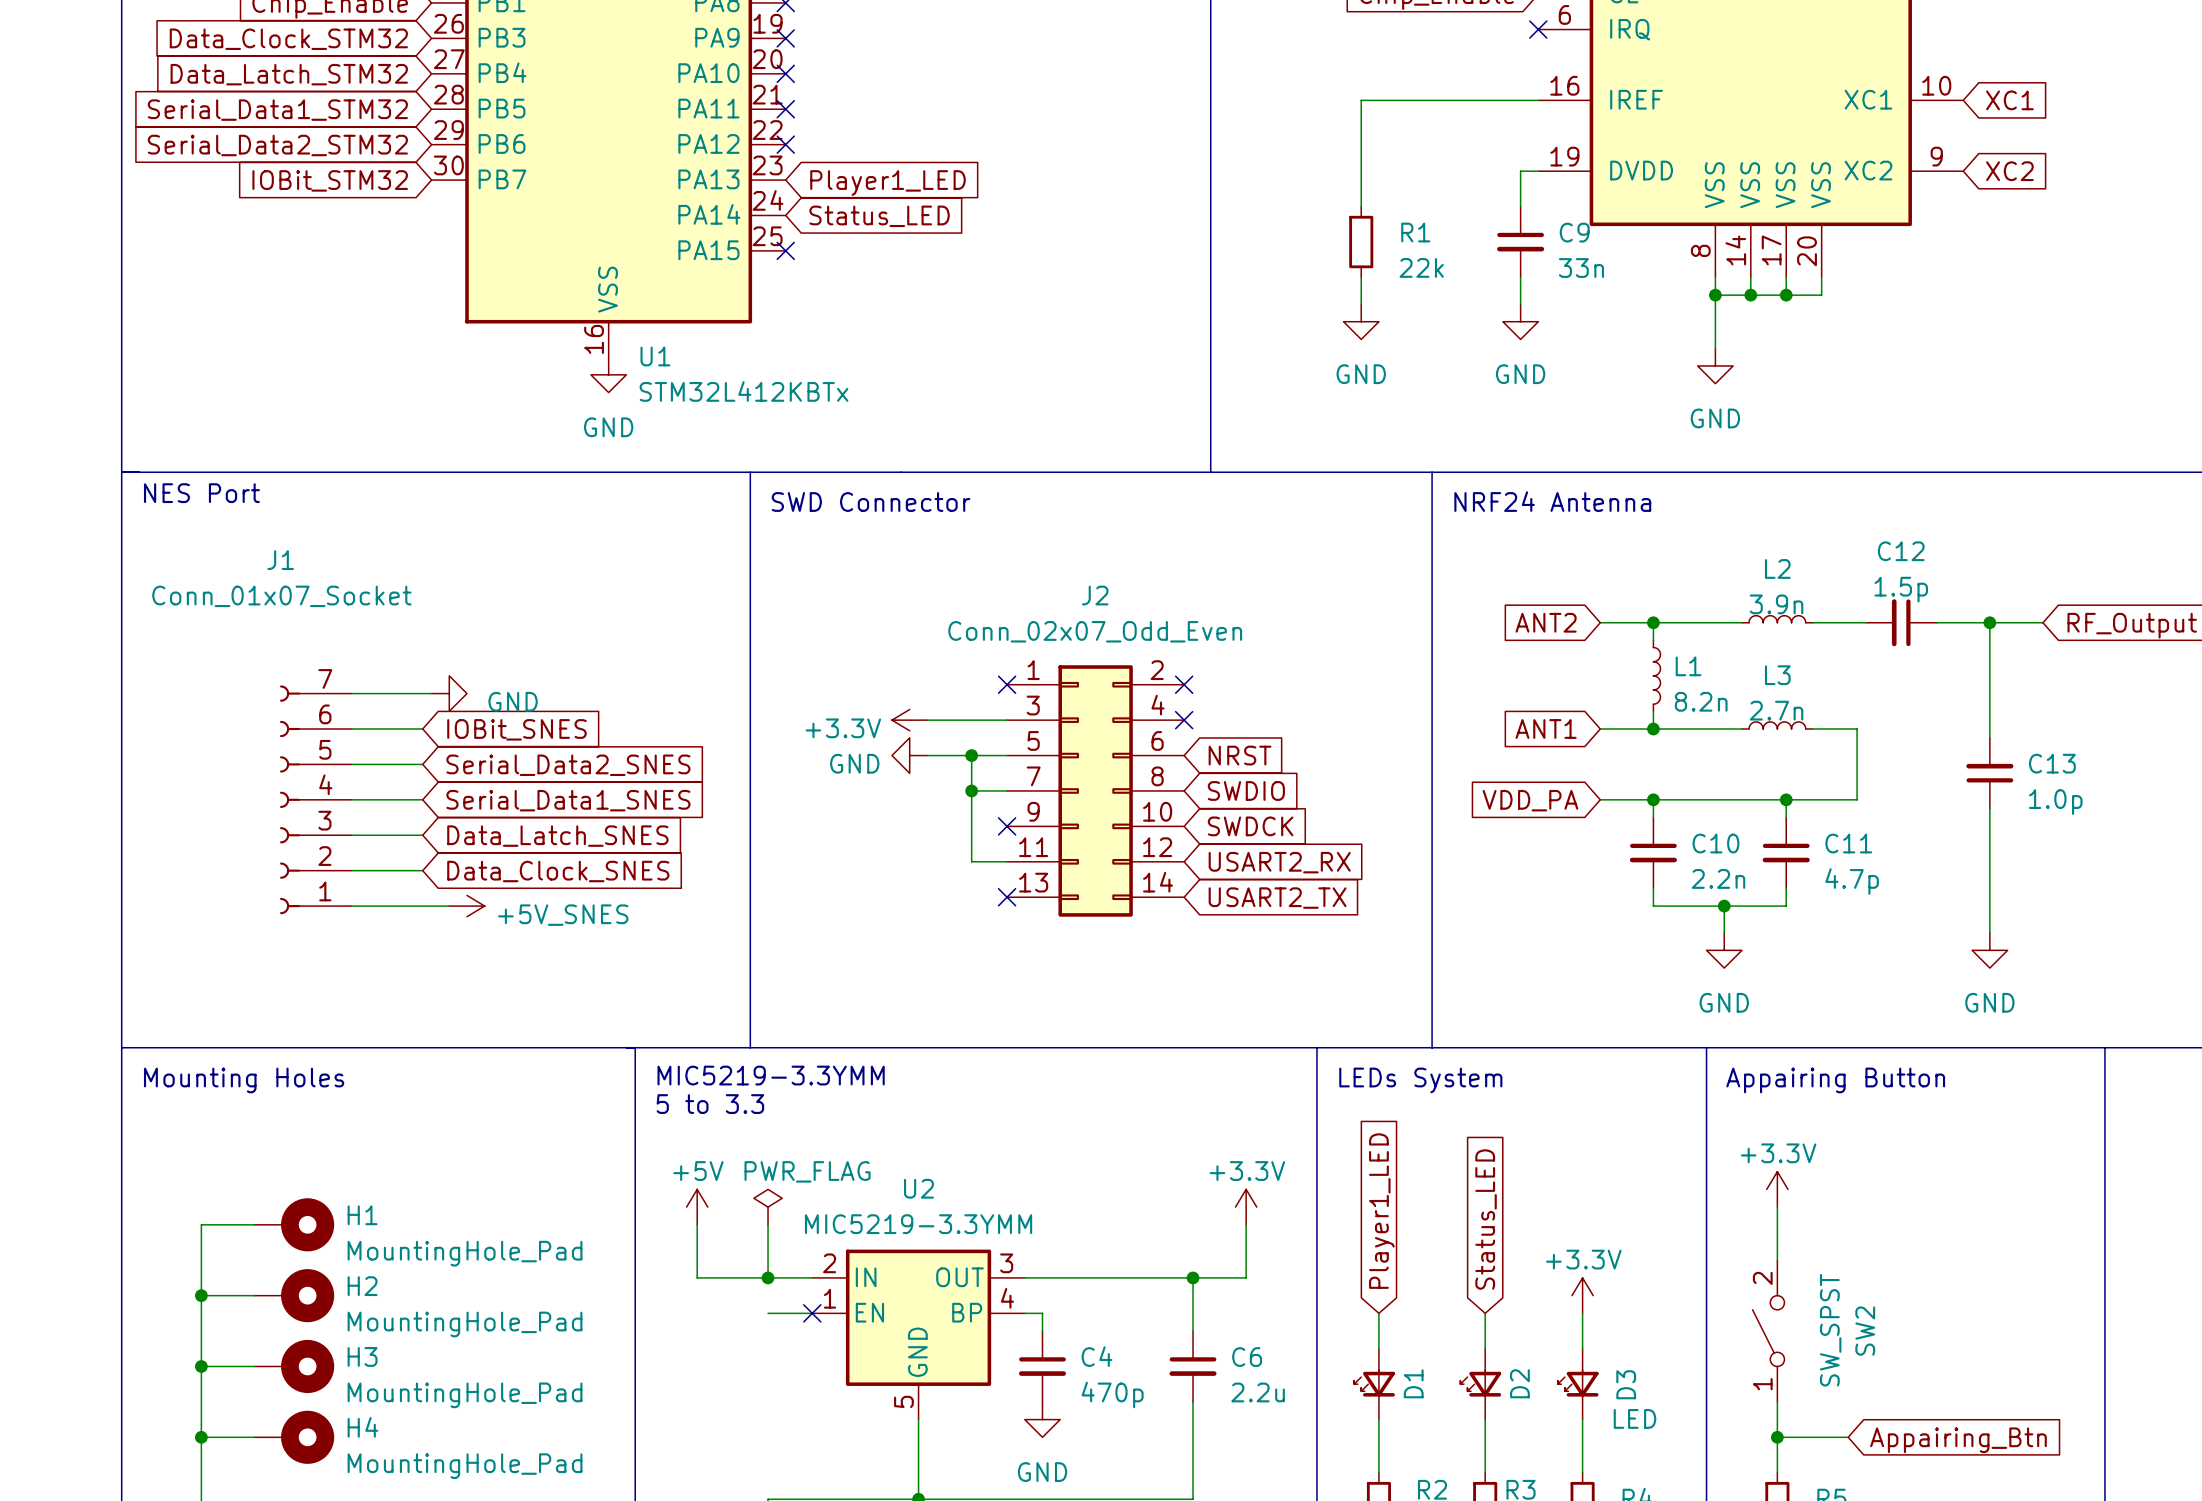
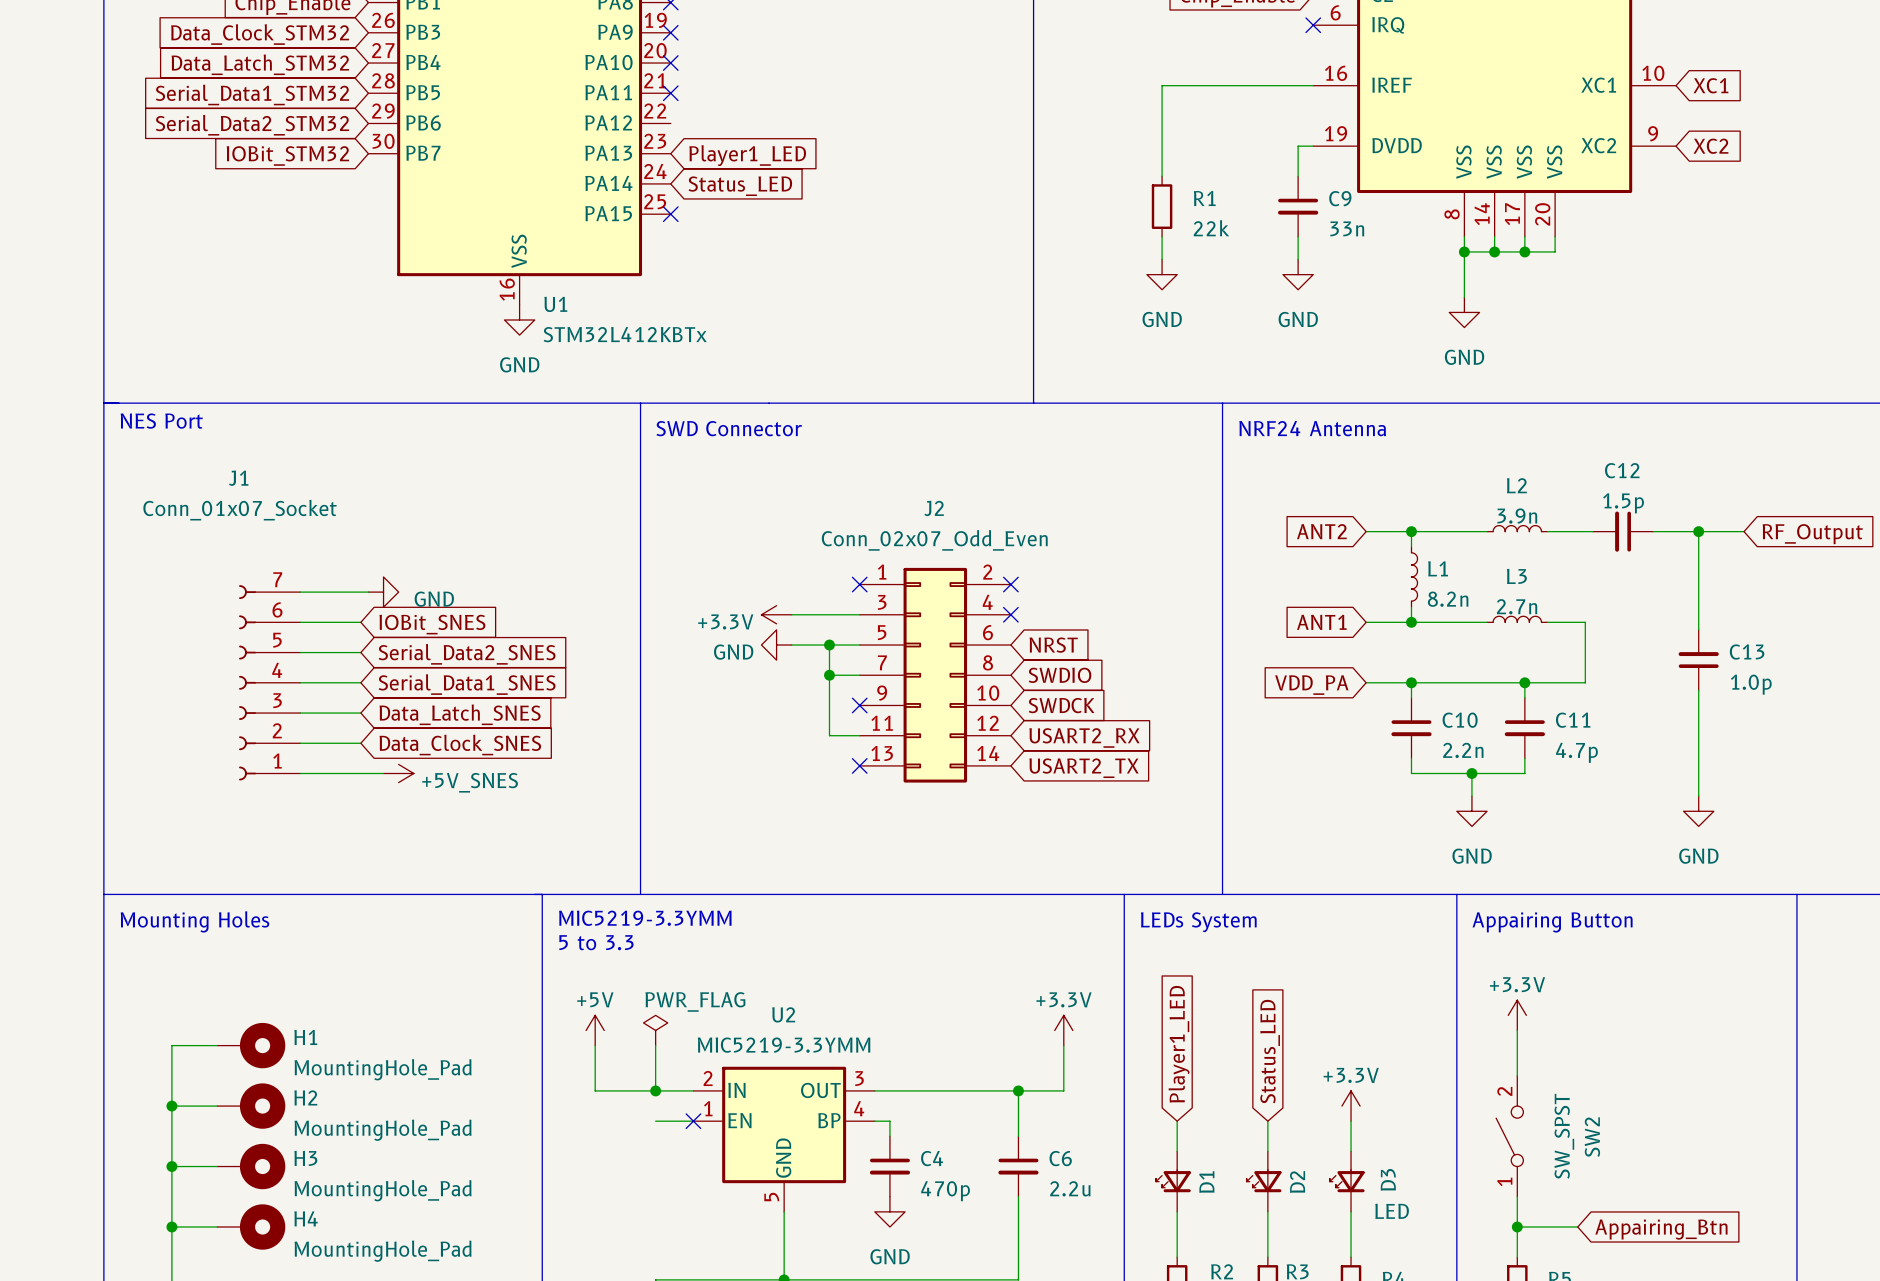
no-connect mark: (785, 144) -> none

